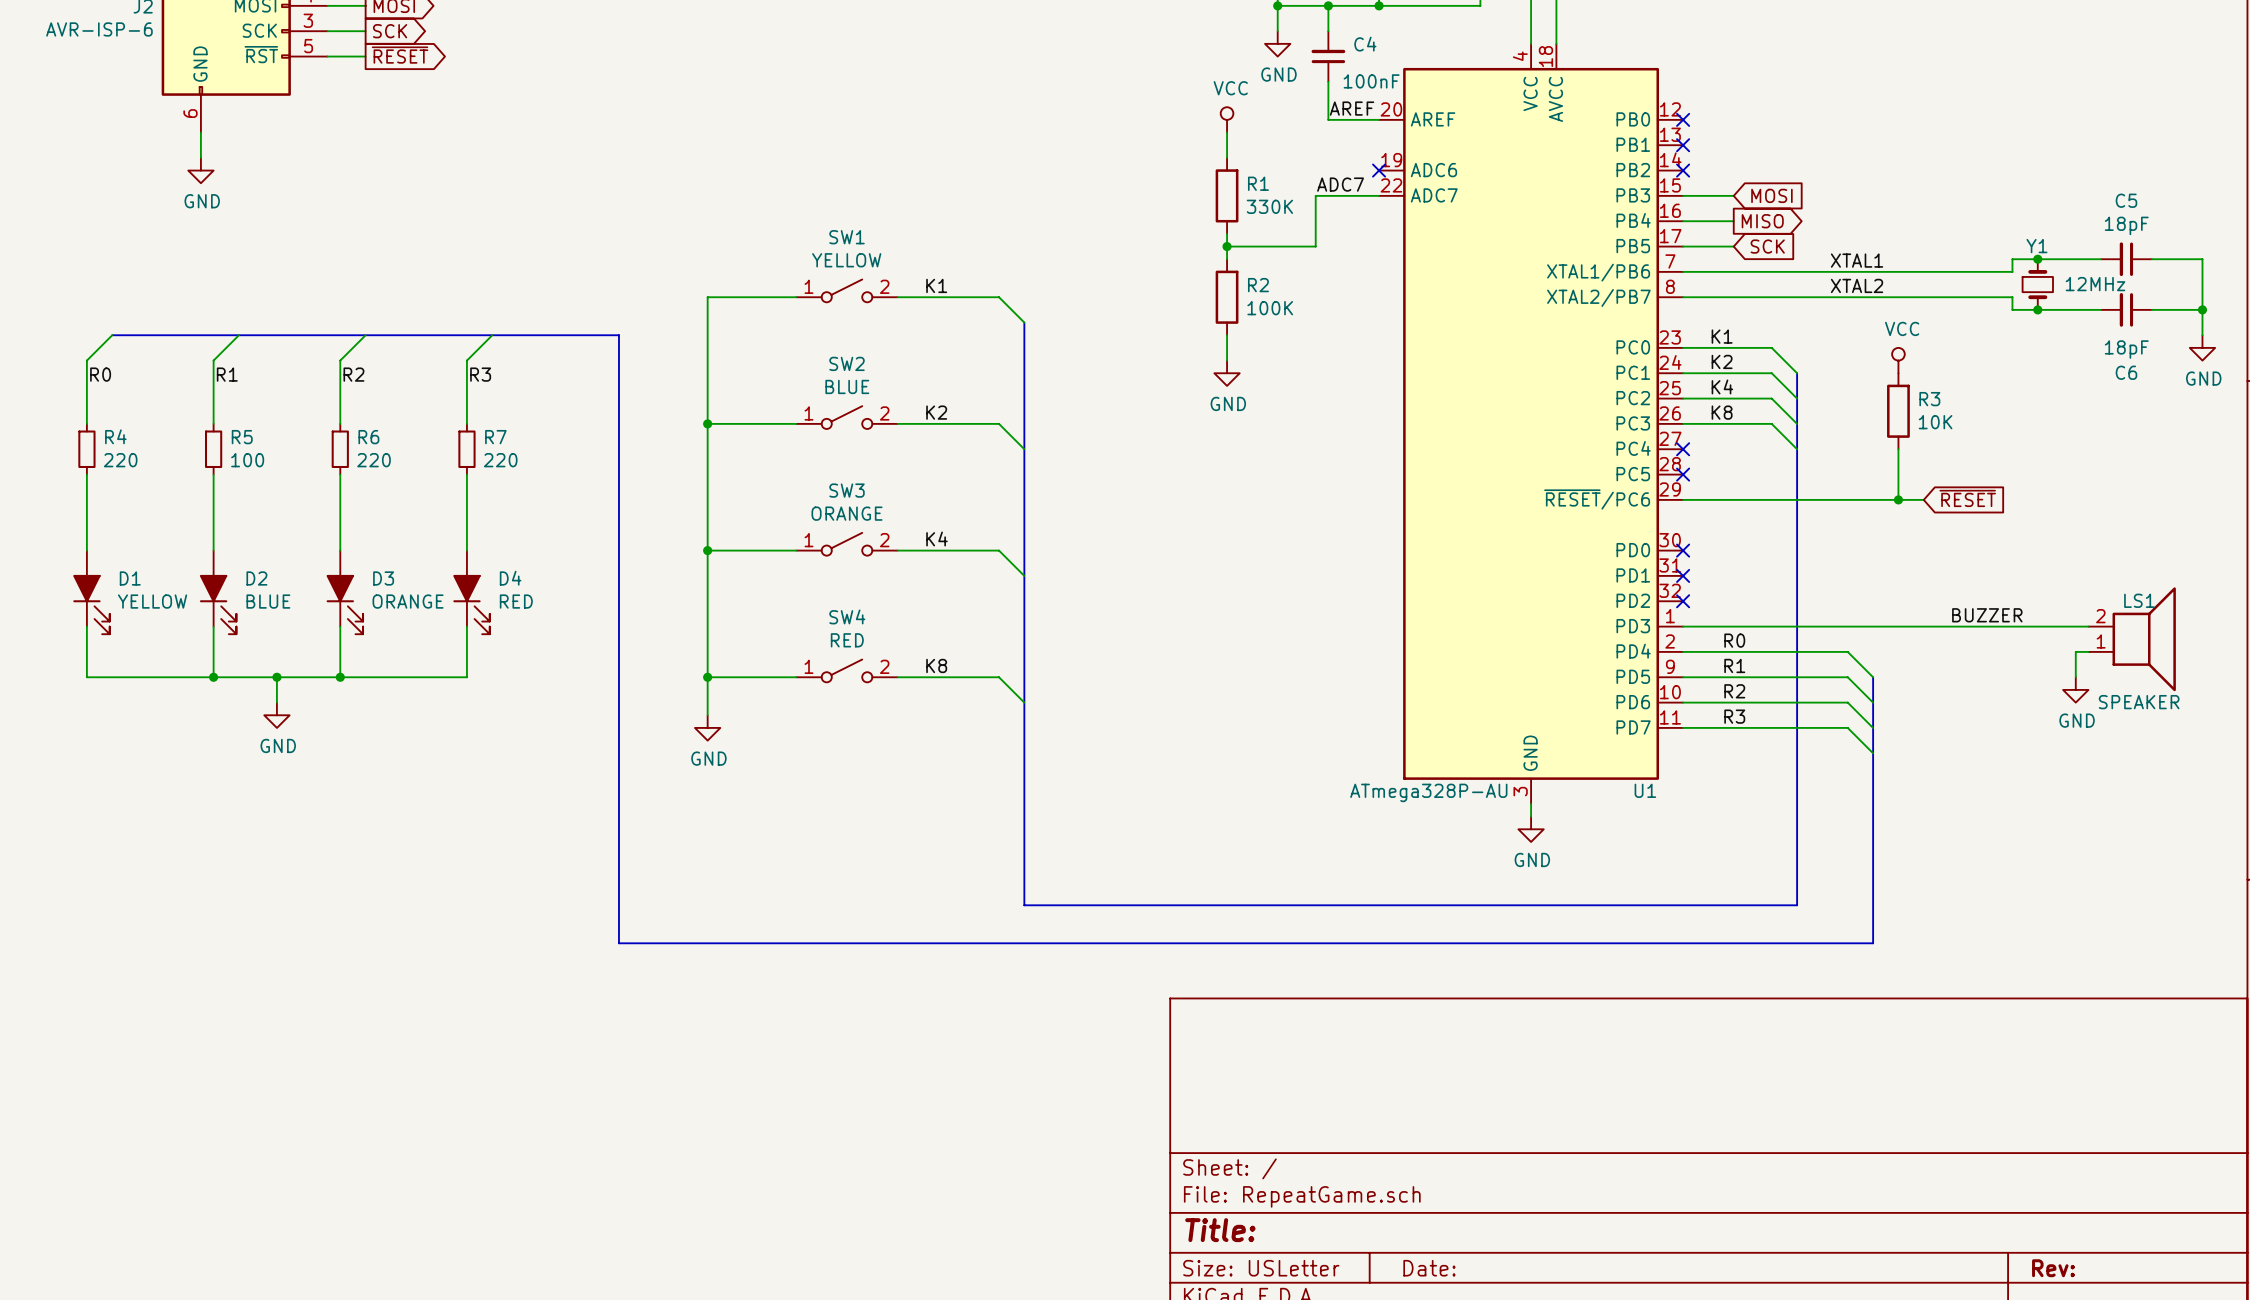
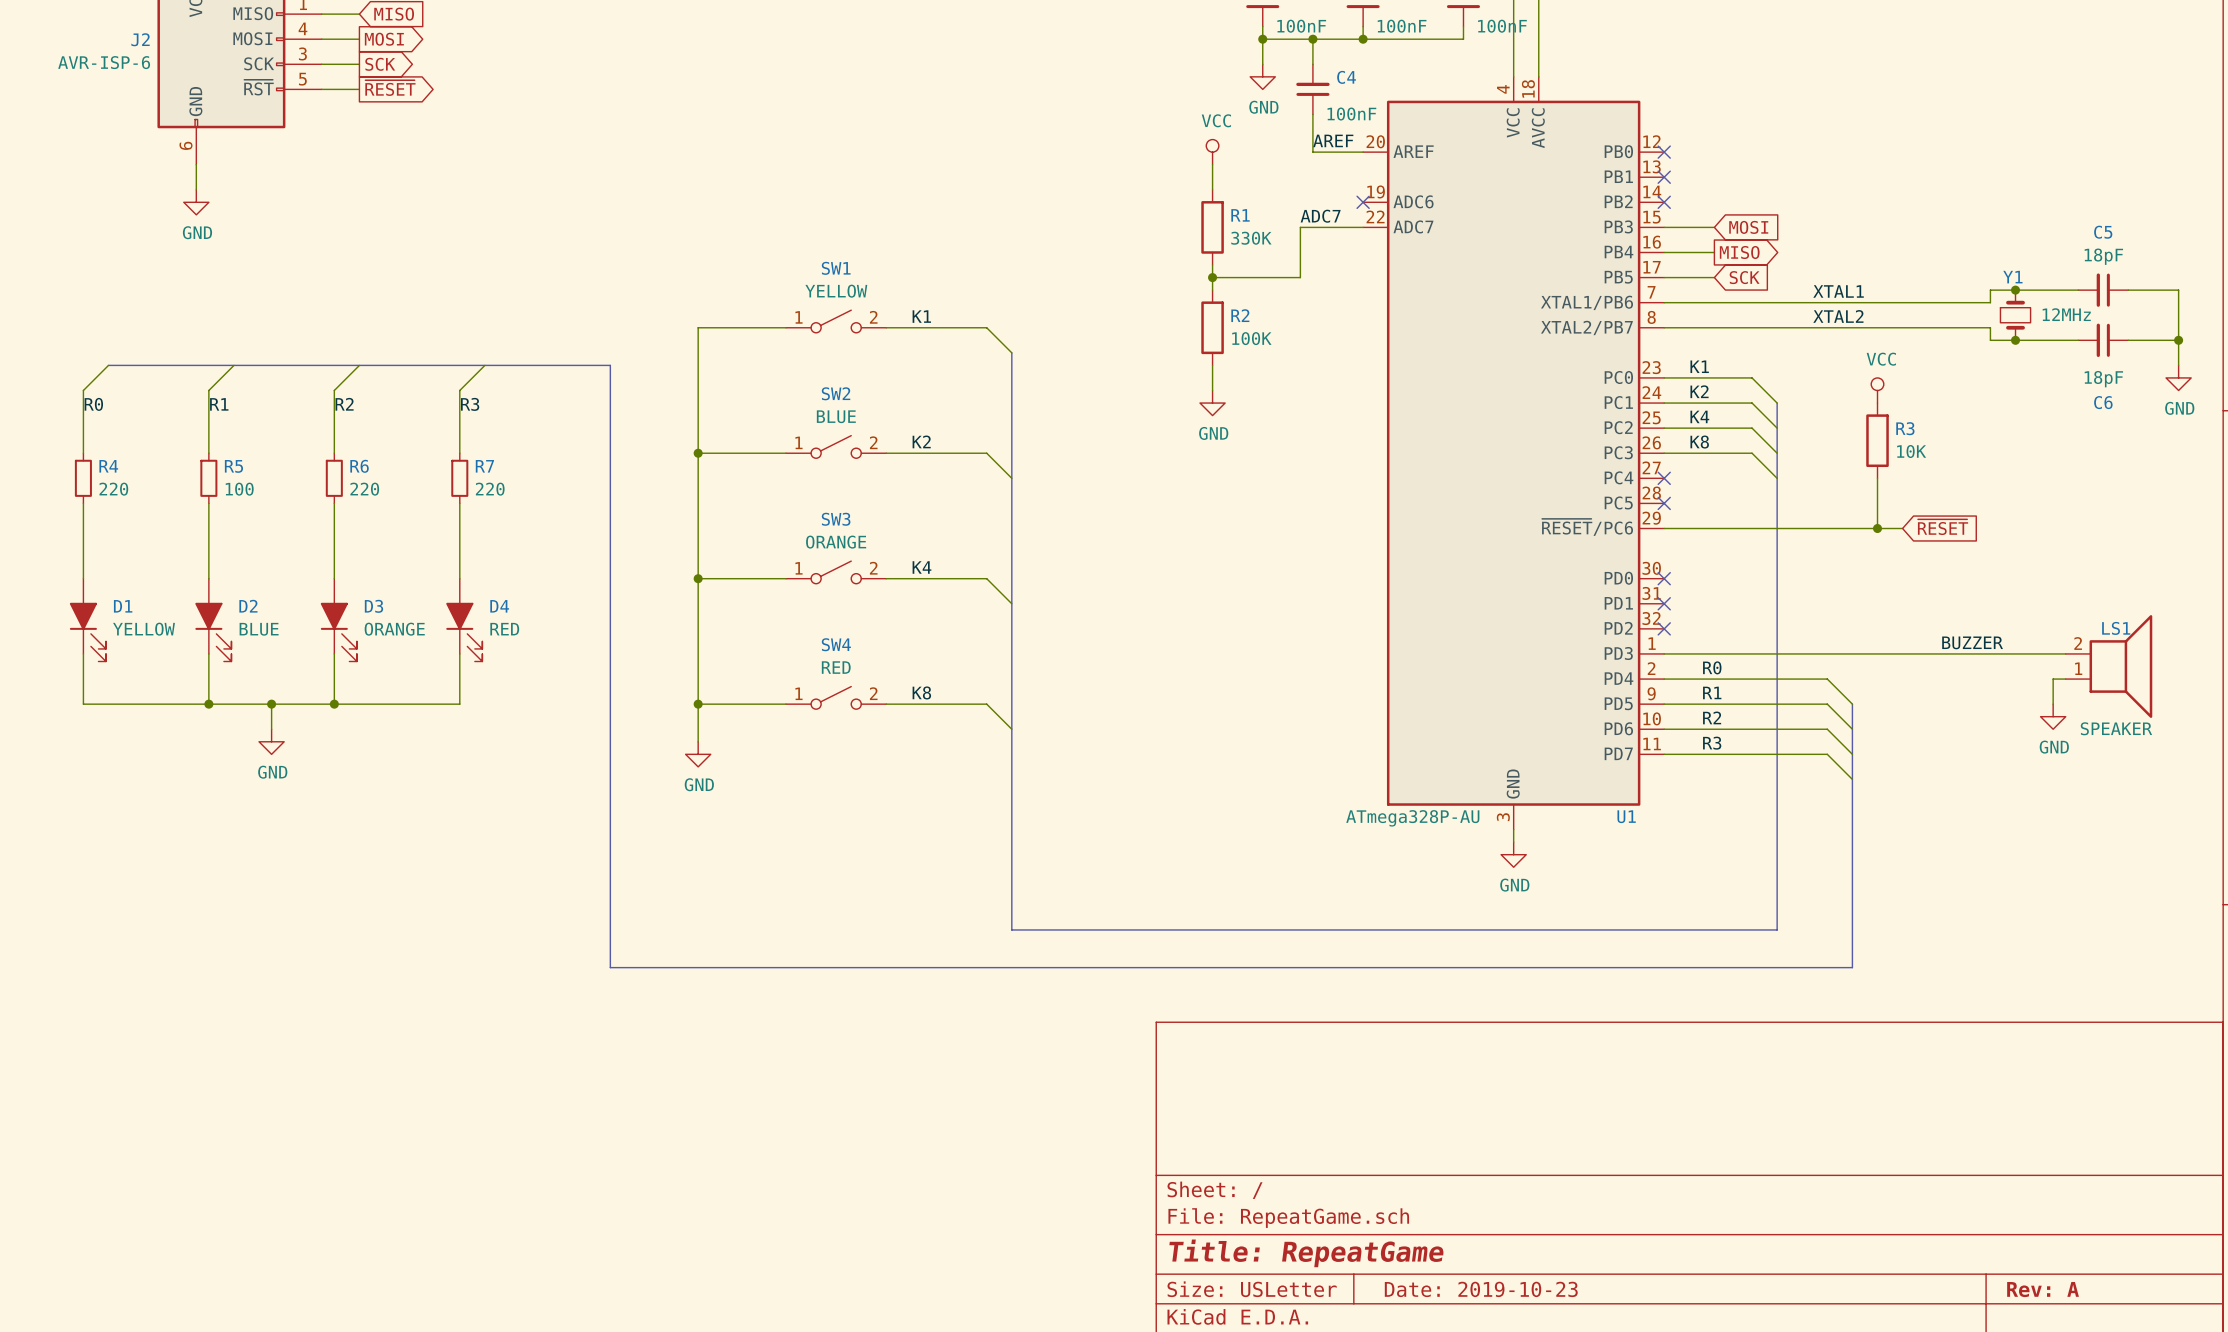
title block: Title: (1220, 1230) -> Title: RepeatGame (1306, 1253)
title block: Date: (1429, 1268) -> Date: 2019-10-23 (1481, 1289)
title block: Rev: (2053, 1268) -> Rev: A (2043, 1289)

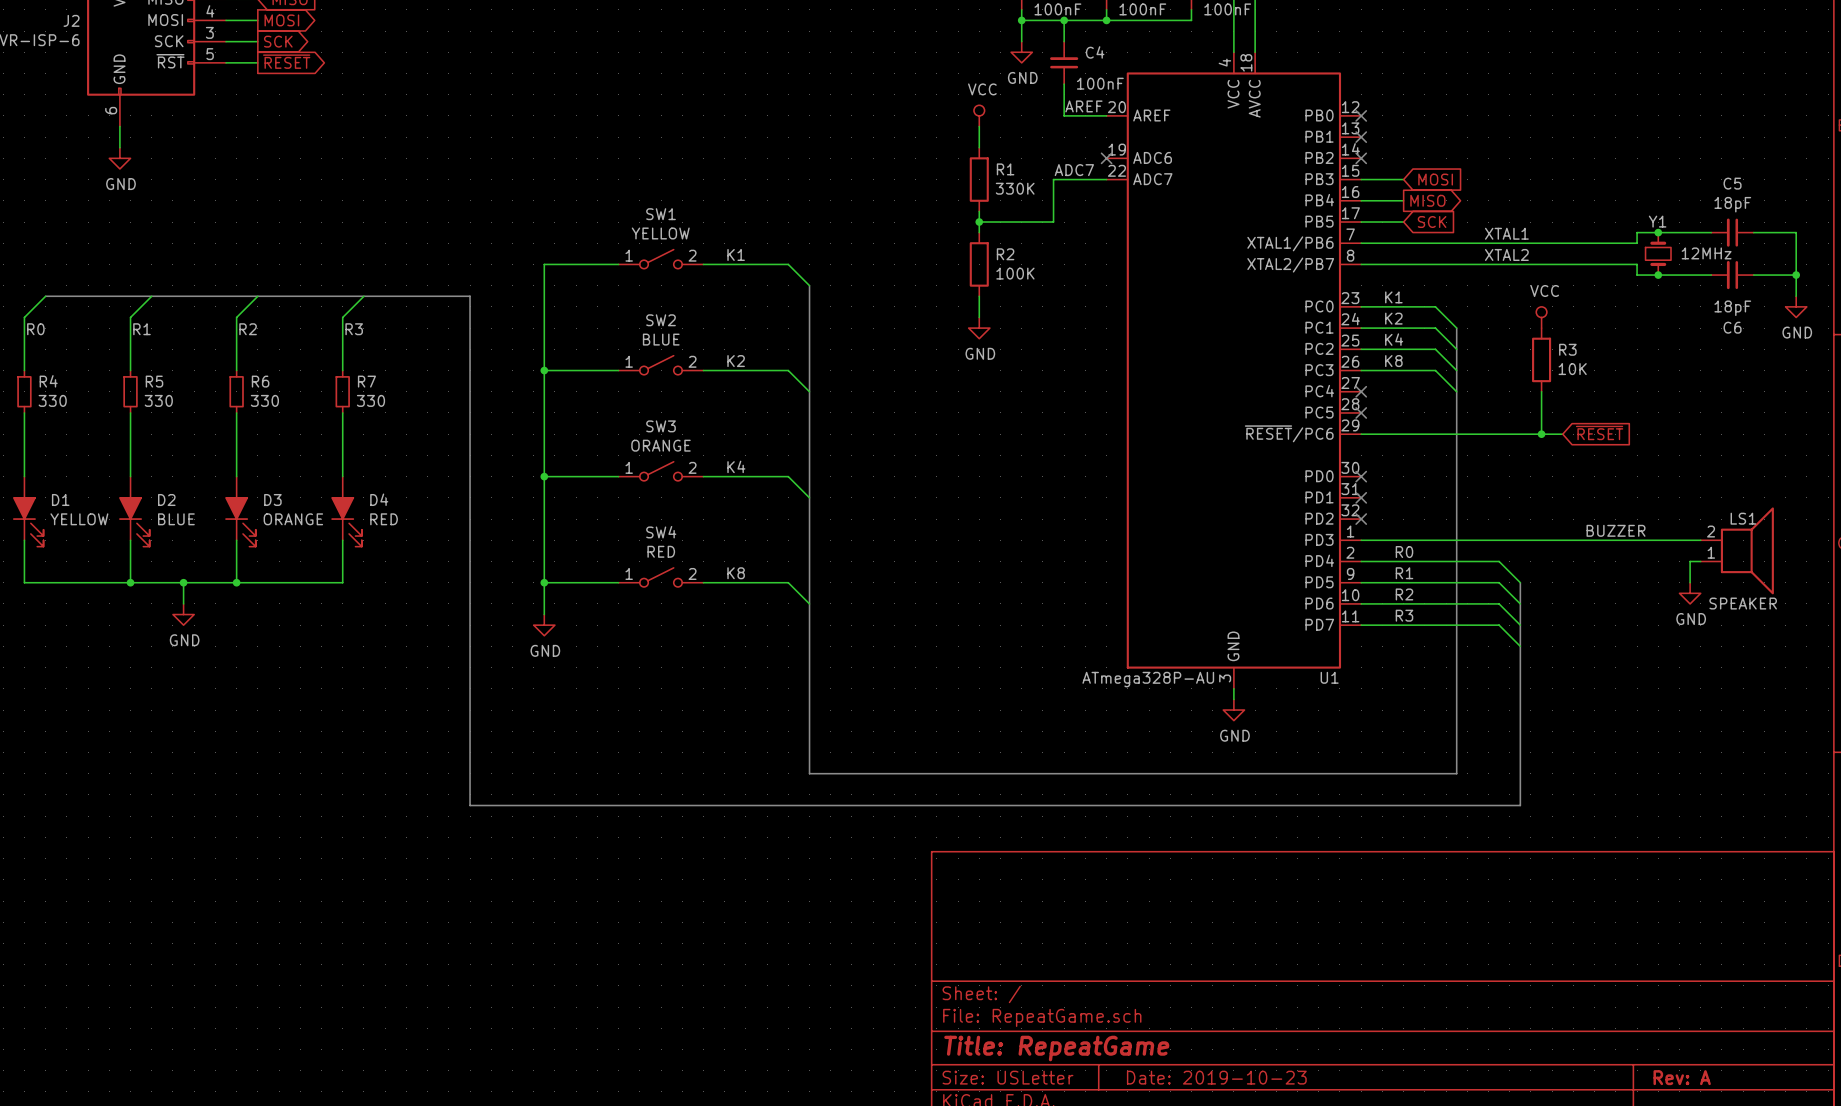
R4 value: 220 (113, 489) -> 330 (52, 400)
R5 value: 100 (239, 489) -> 330 (158, 400)
R6 value: 220 (364, 489) -> 330 (264, 400)
R7 value: 220 (490, 489) -> 330 (370, 400)

